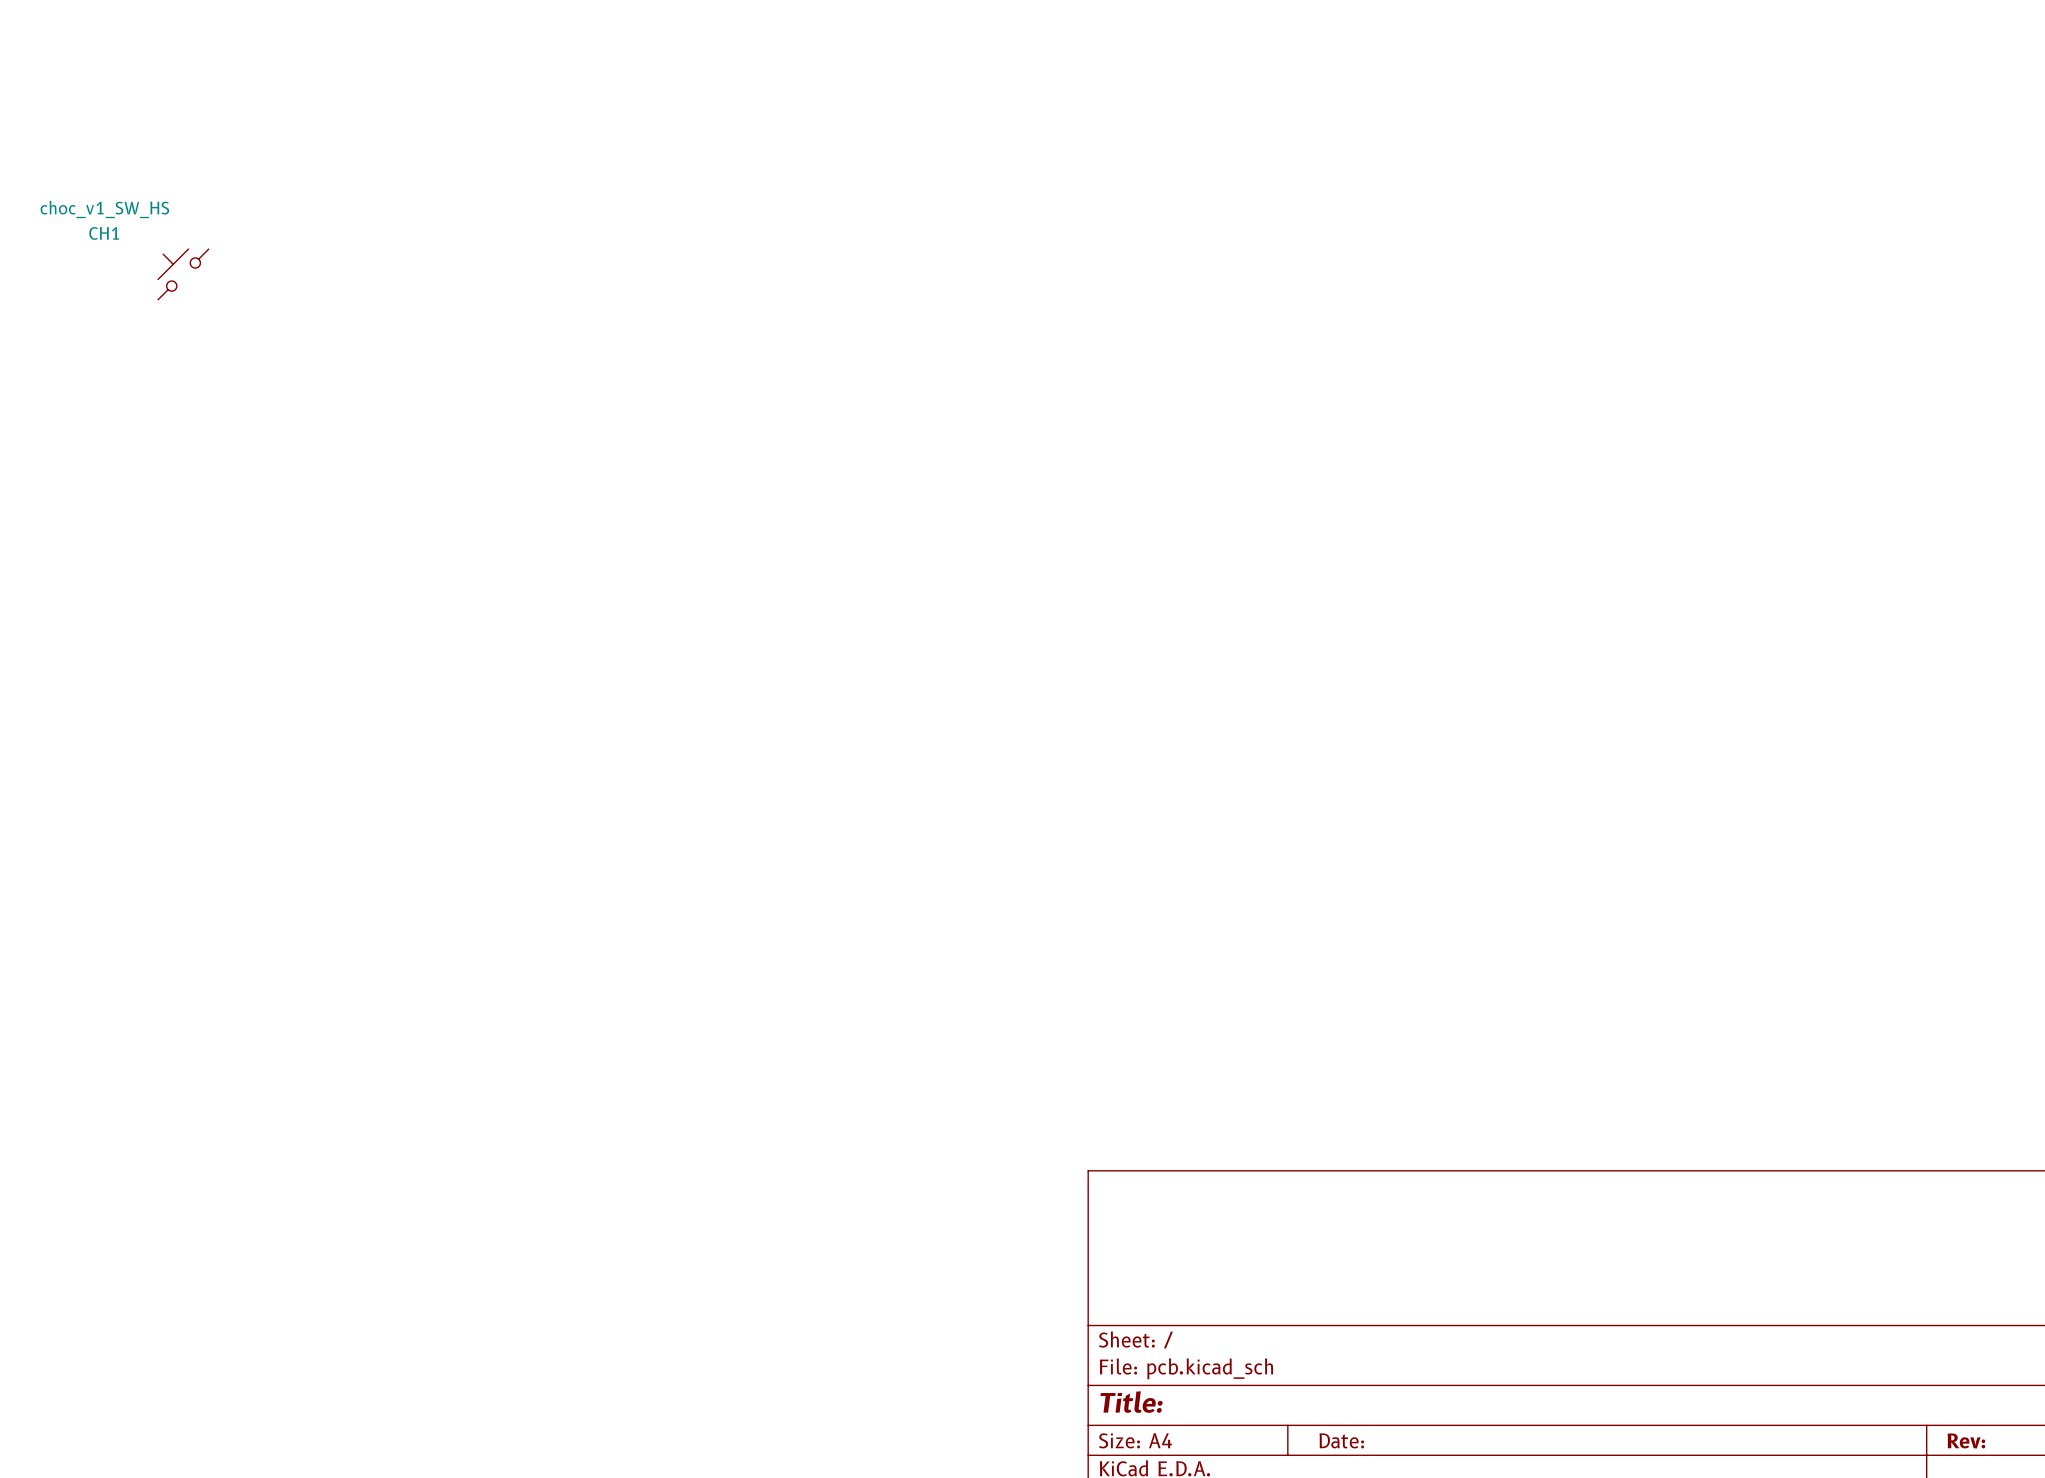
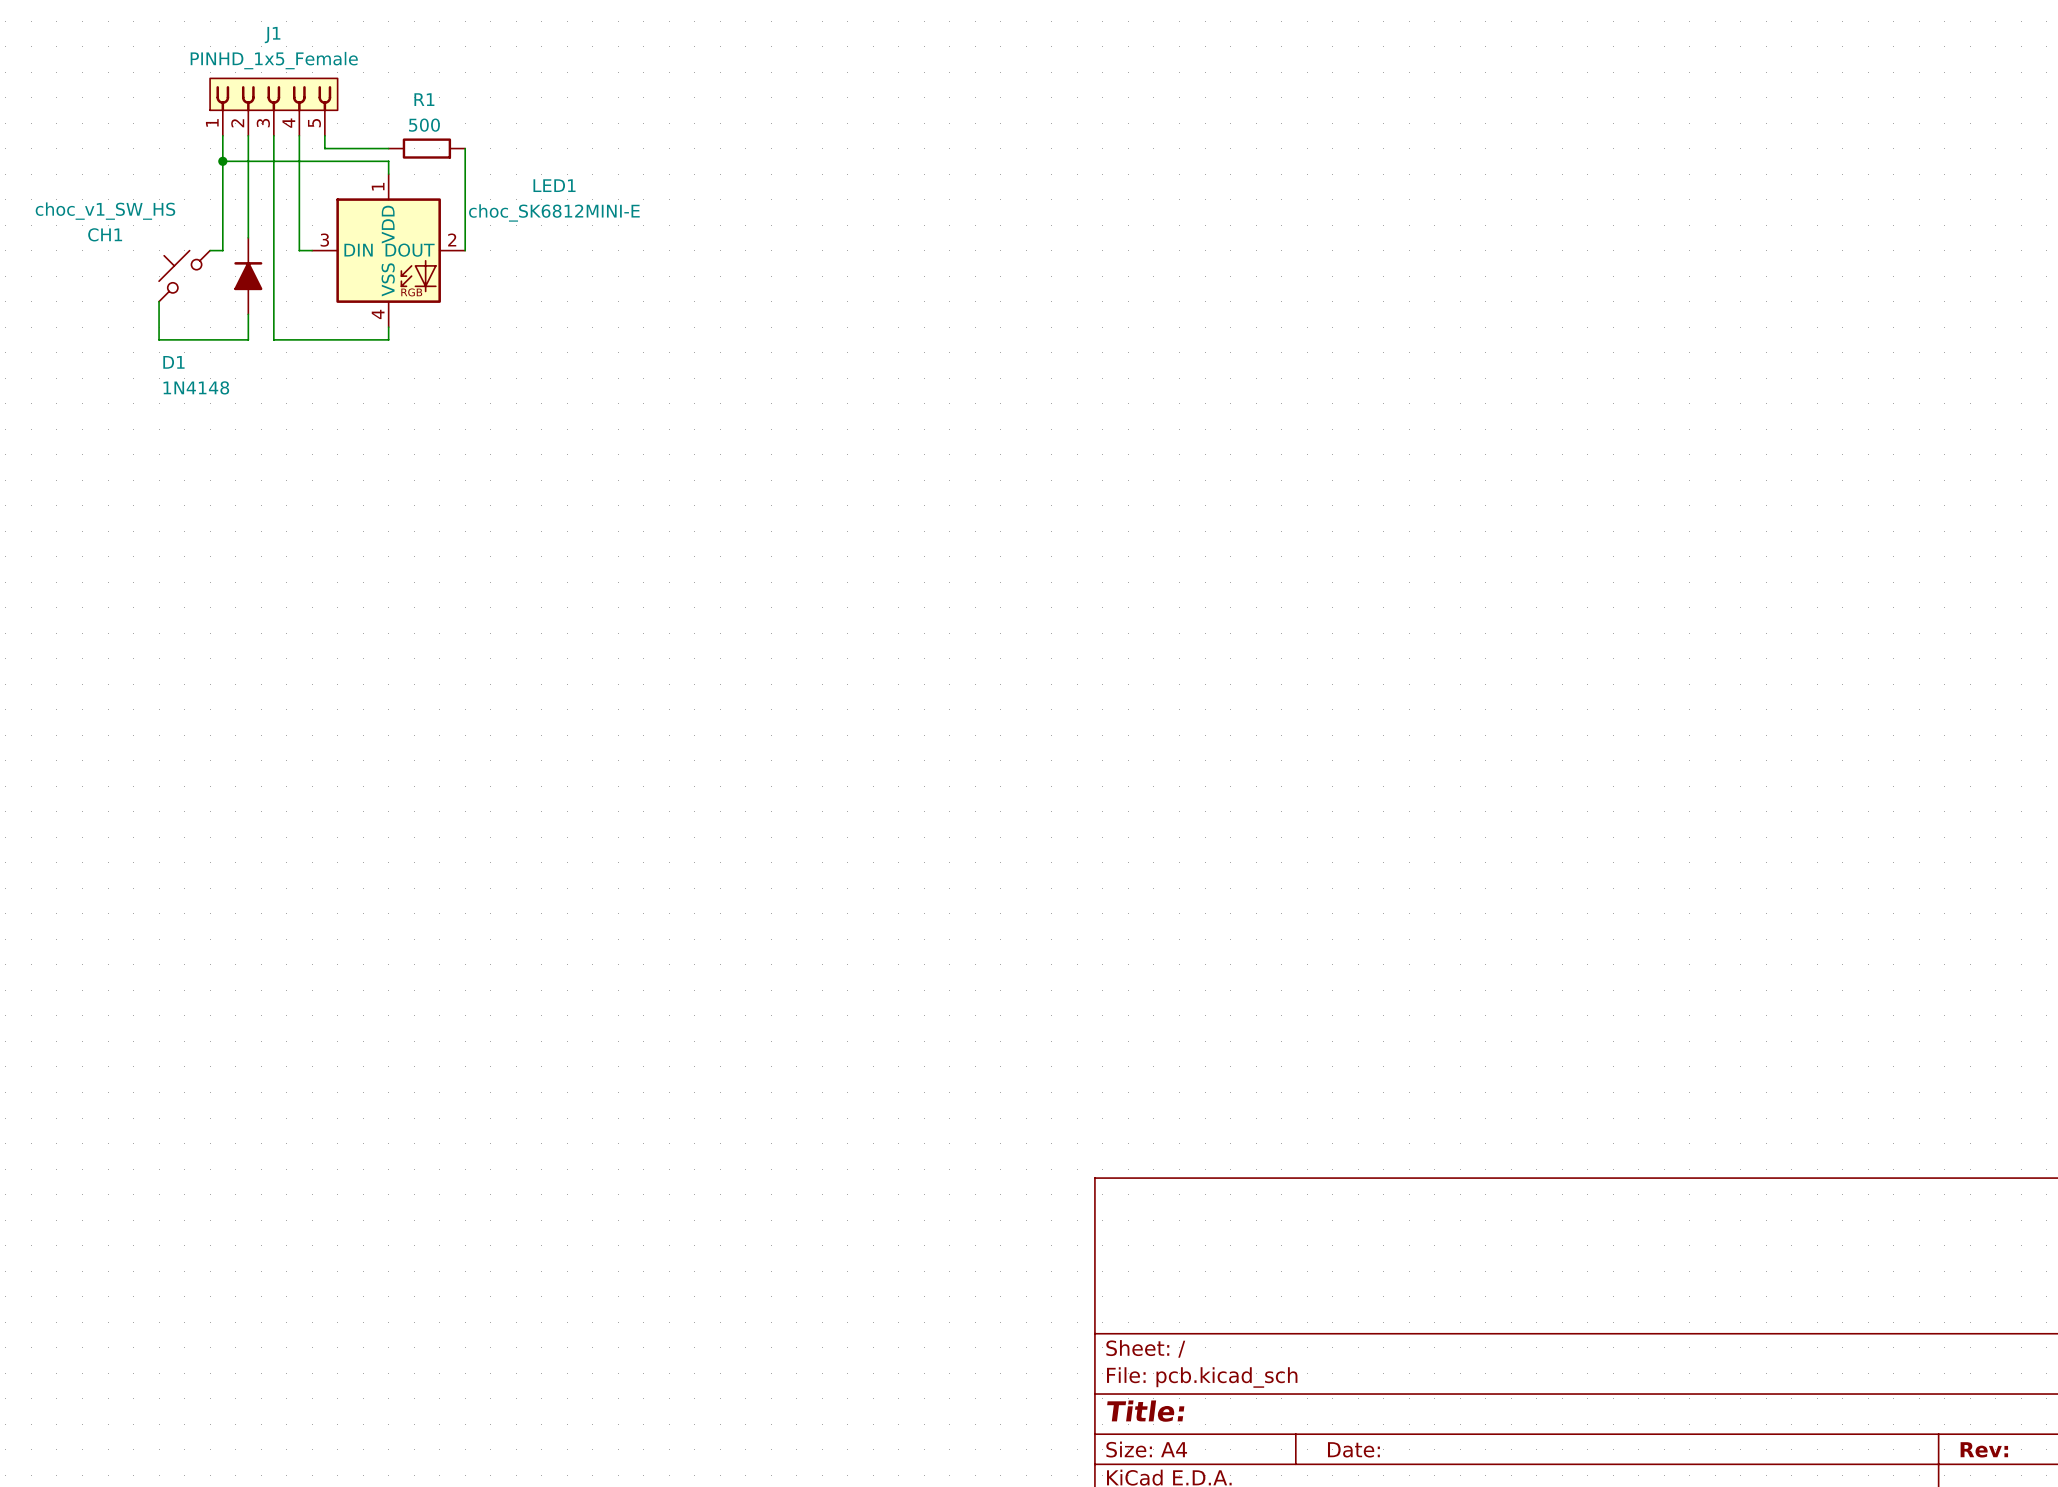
J1: none -> PINHD_1x5_Female (273, 107)
wire: none -> (222, 135) (222, 250) (210, 250)
wire: none -> (248, 135) (248, 237)
wire: none -> (273, 135) (273, 339) (388, 339) (388, 327)
wire: none -> (299, 135) (299, 250) (312, 250)
wire: none -> (324, 135) (324, 148) (388, 148)
R1: none -> 500 (426, 148)
wire: none -> (465, 148) (465, 250)
wire: none -> (222, 161) (388, 161) (388, 174)
junction: none -> (222, 161)
LED1: none -> choc_SK6812MINI-E (388, 250)
D1: none -> 1N4148 (248, 276)
wire: none -> (159, 301) (159, 339) (248, 339) (248, 314)

